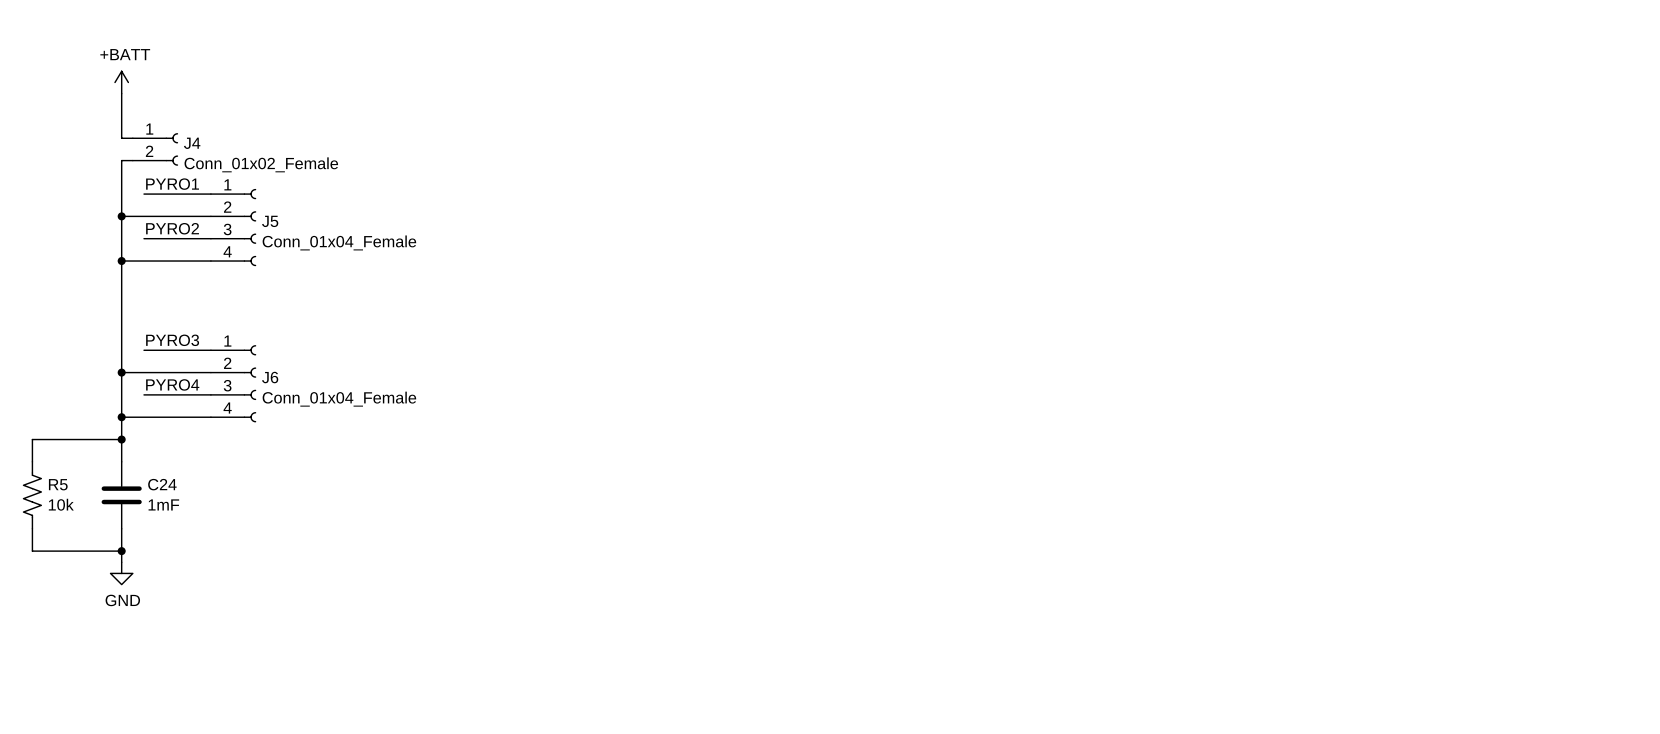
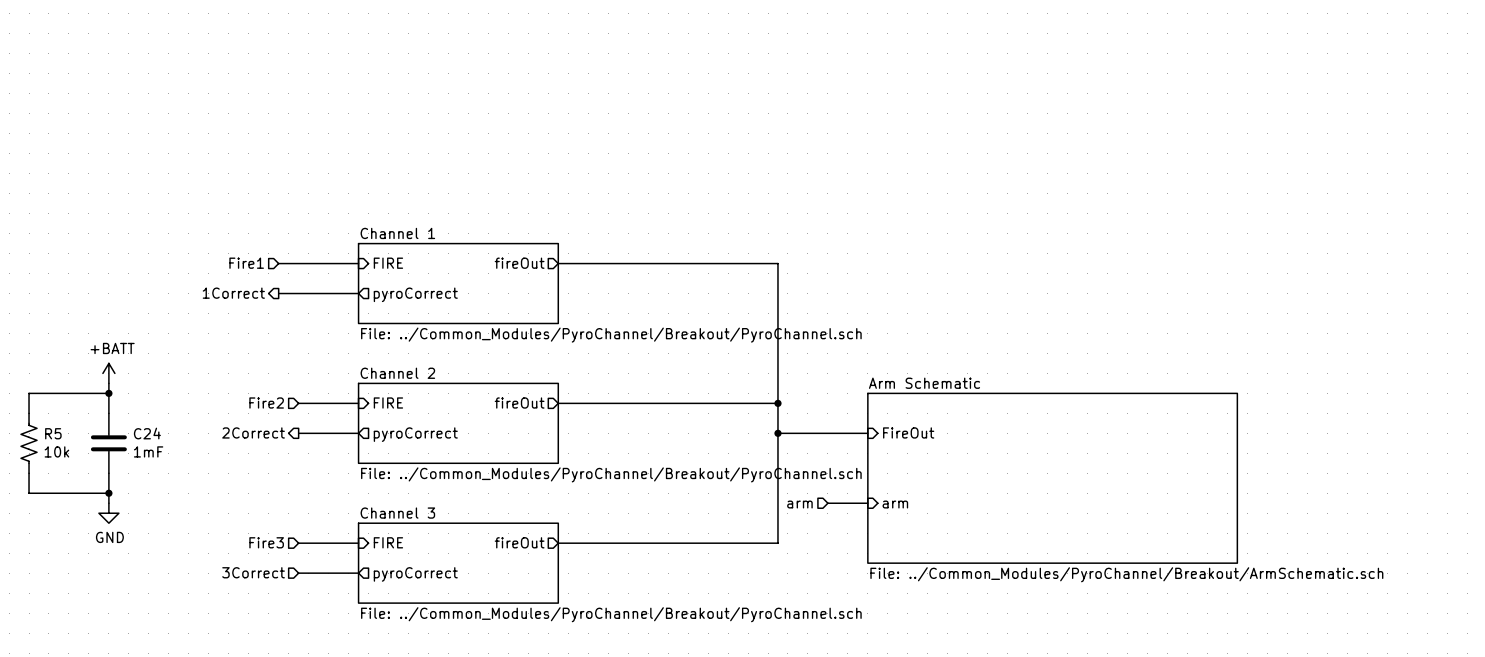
power symbol: +BATT (121, 82) -> none
wire: (121, 93) (121, 138) (132, 138) -> none
J4: Conn_01x02_Female (155, 149) -> none
wire: (132, 160) (121, 160) (121, 428) -> none
label: PYRO1 (172, 184) -> none
wire: (143, 194) (210, 194) -> none
wire: (121, 216) (210, 216) -> none
junction: (121, 216) -> none
J5: Conn_01x04_Female (233, 227) -> none
label: PYRO2 (172, 228) -> none
wire: (143, 238) (210, 238) -> none
wire: (121, 261) (210, 261) -> (278, 263) (358, 263)
junction: (121, 261) -> none
hierarchical label: none -> Fire1 (246, 263)
sheet pin: none -> fireOut (519, 263)
sheet pin: none -> FIRE (388, 263)
wire: none -> (558, 263) (777, 263) (777, 543) (558, 543)
sheet Channel 1: none -> File: ../Common_Modules/PyroChannel/Breakout/PyroChannel.sch (458, 283)
hierarchical label: none -> 1Correct (233, 293)
sheet pin: none -> pyroCorrect (415, 294)
label: PYRO3 (172, 340) -> none
wire: (143, 350) (210, 350) -> none
wire: (121, 372) (210, 372) -> (278, 293) (358, 293)
junction: (121, 372) -> none
J6: Conn_01x04_Female (233, 383) -> none
label: PYRO4 (172, 384) -> none
wire: (143, 394) (210, 394) -> (298, 403) (358, 403)
wire: (121, 417) (210, 417) -> none
power symbol: none -> +BATT (108, 373)
junction: (121, 417) -> none
hierarchical label: none -> Fire2 (266, 403)
sheet pin: none -> FIRE (388, 403)
sheet pin: none -> fireOut (519, 403)
wire: none -> (558, 403) (777, 403)
junction: none -> (777, 403)
sheet Channel 2: none -> File: ../Common_Modules/PyroChannel/Breakout/PyroChannel.sch (458, 423)
hierarchical label: none -> 2Correct (253, 432)
sheet pin: none -> FireOut (908, 432)
wire: none -> (298, 433) (358, 433)
wire: none -> (777, 433) (867, 433)
junction: none -> (777, 433)
sheet pin: none -> pyroCorrect (415, 434)
sheet Arm Schematic: none -> File: ../Common_Modules/PyroChannel/Breakout/ArmSchematic.sch (1052, 478)
wire: none -> (827, 503) (867, 503)
hierarchical label: none -> arm (799, 504)
sheet pin: none -> arm (895, 504)
hierarchical label: none -> Fire3 (266, 542)
wire: none -> (298, 543) (358, 543)
sheet pin: none -> FIRE (388, 542)
sheet pin: none -> fireOut (519, 542)
sheet Channel 3: none -> File: ../Common_Modules/PyroChannel/Breakout/PyroChannel.sch (458, 563)
hierarchical label: none -> 3Correct (253, 572)
wire: none -> (298, 573) (358, 573)
sheet pin: none -> pyroCorrect (415, 574)

